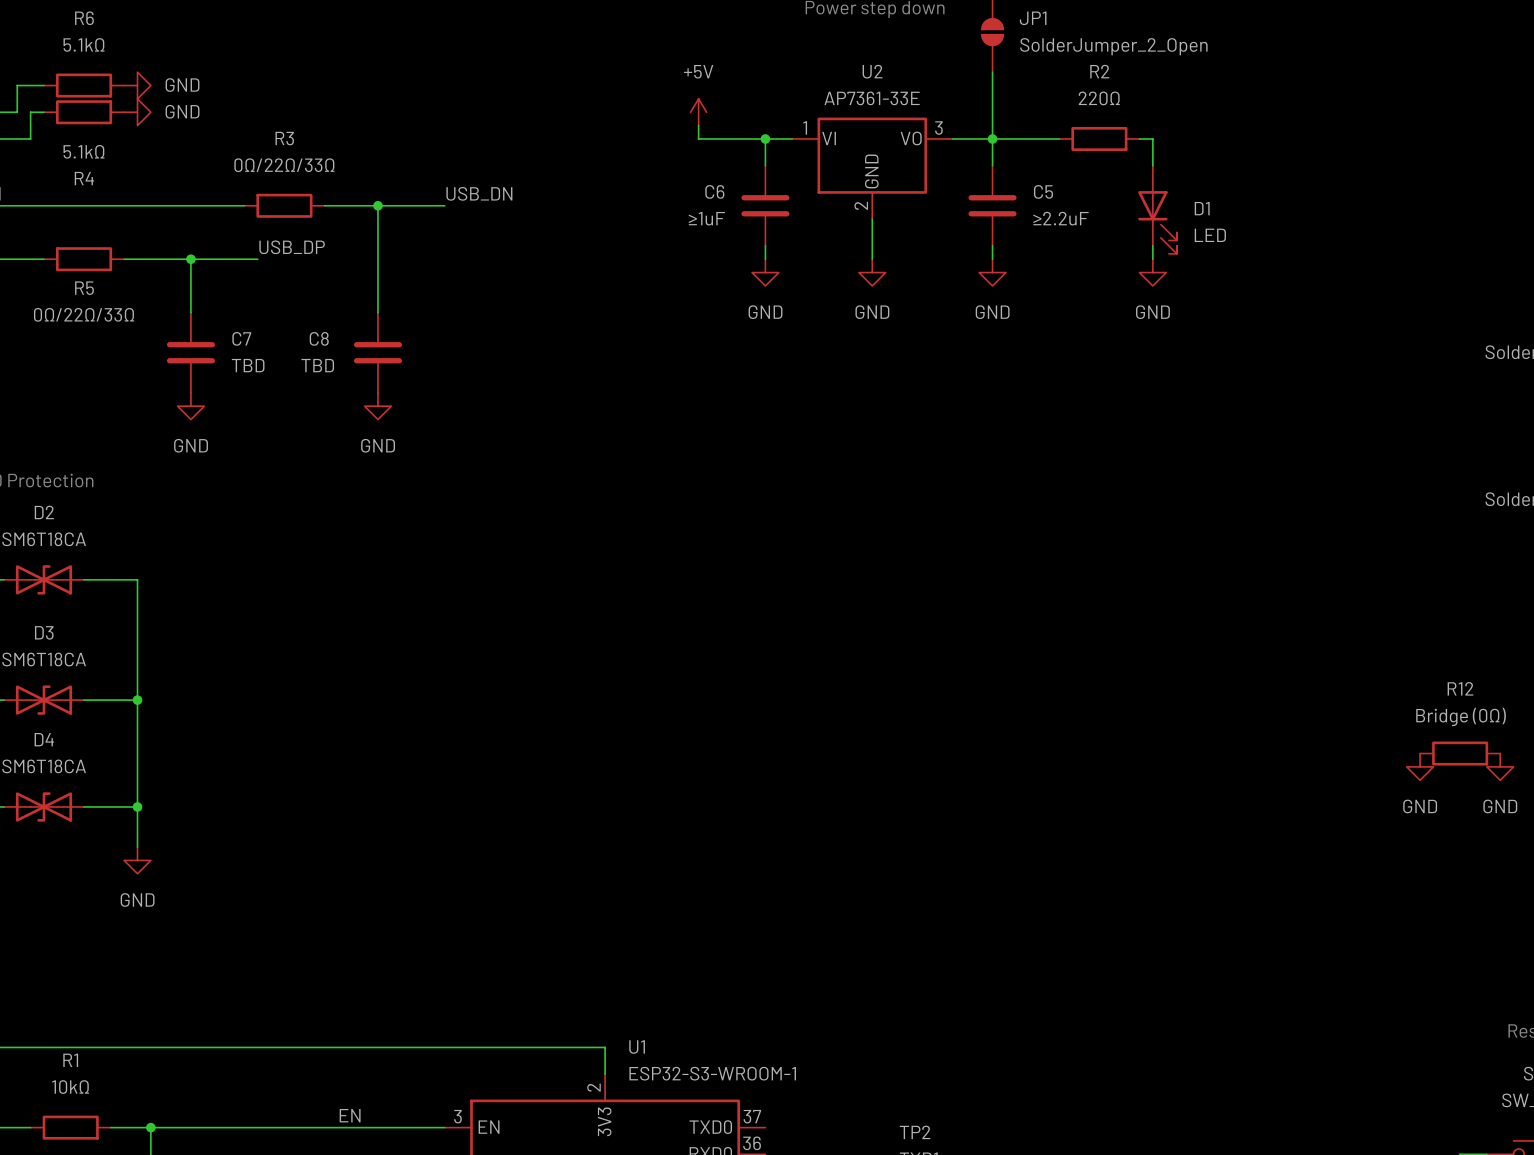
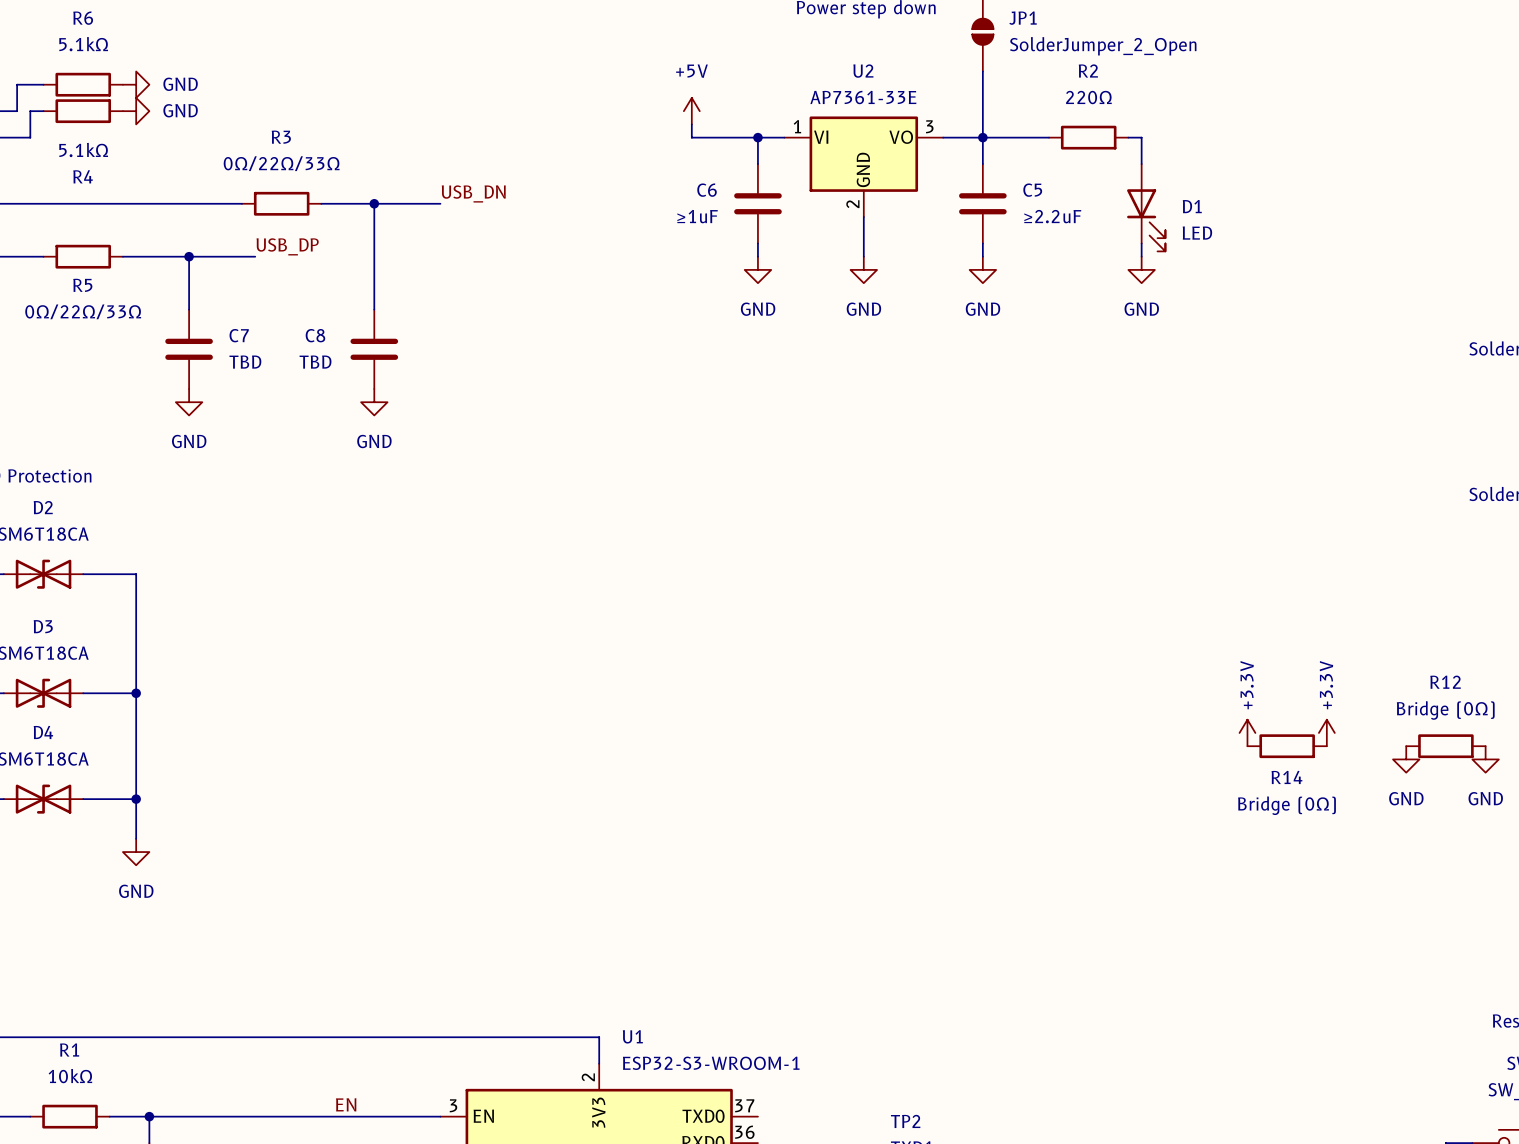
power symbol: none -> +3.3V (1247, 732)
power symbol: none -> +3.3V (1326, 732)
R14: none -> Bridge (0Ω) (1287, 746)

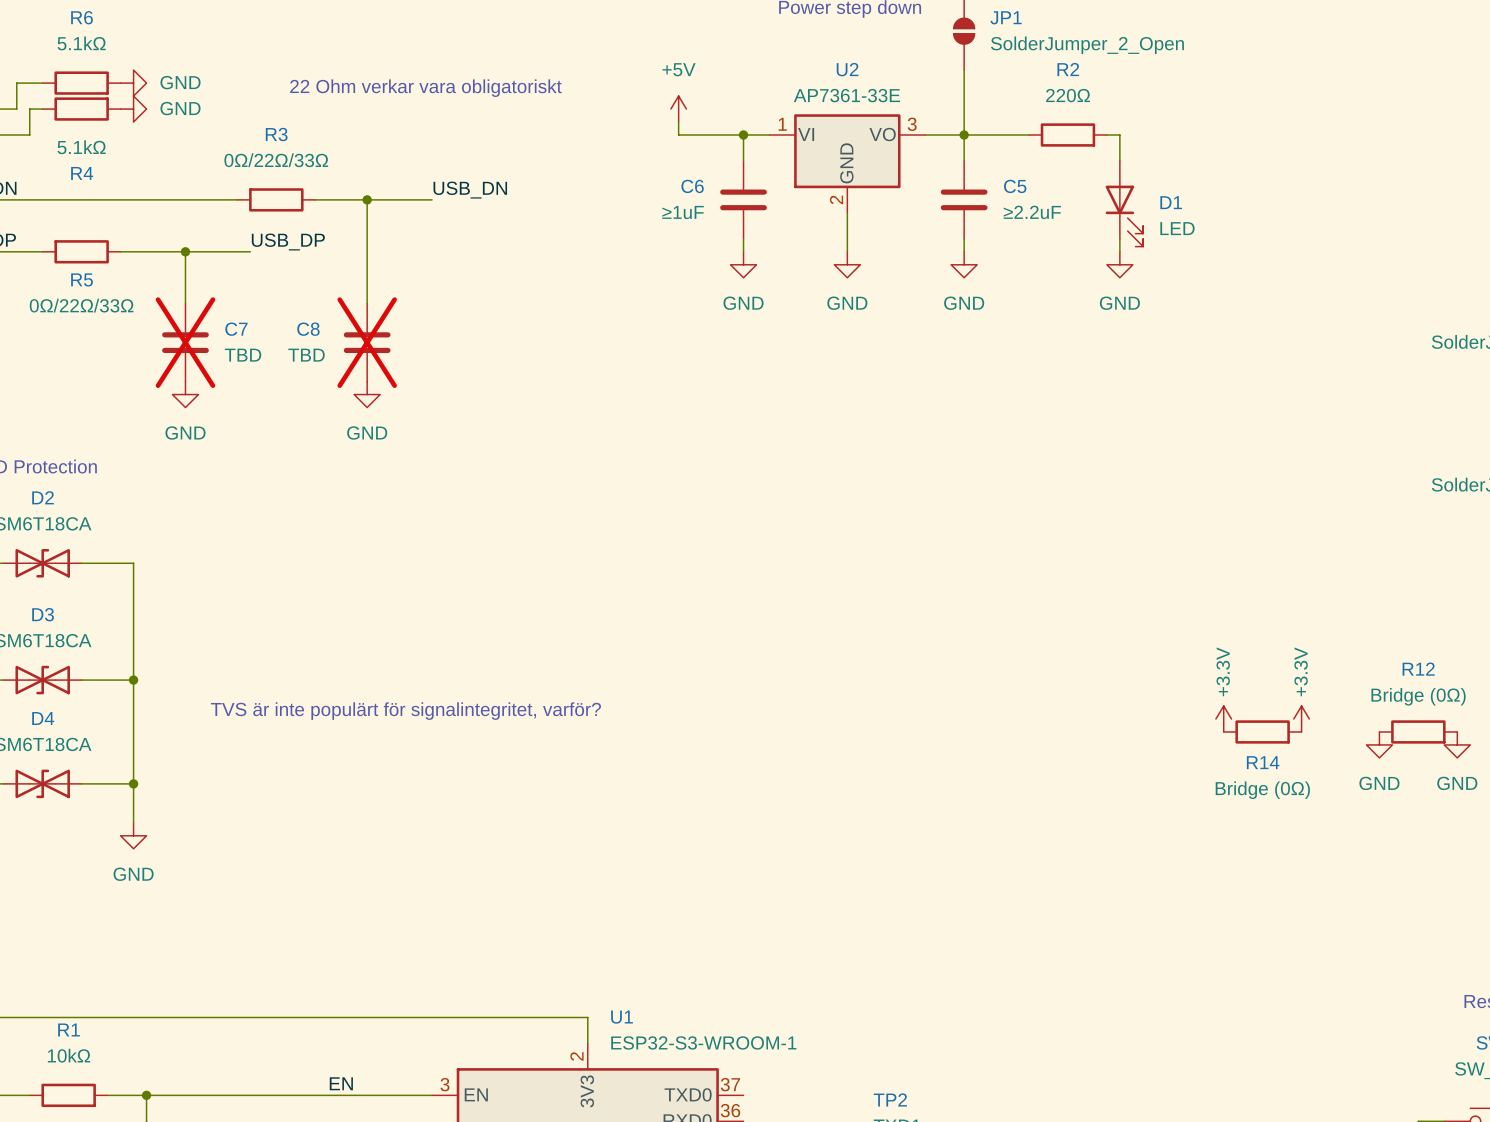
text: none -> 22 Ohm verkar vara obligatoriskt (425, 88)
C7 do-not-place cross: none -> (185, 342)
C8 do-not-place cross: none -> (367, 342)
text: none -> TVS är inte populärt för signalintegritet, varför? (405, 711)

